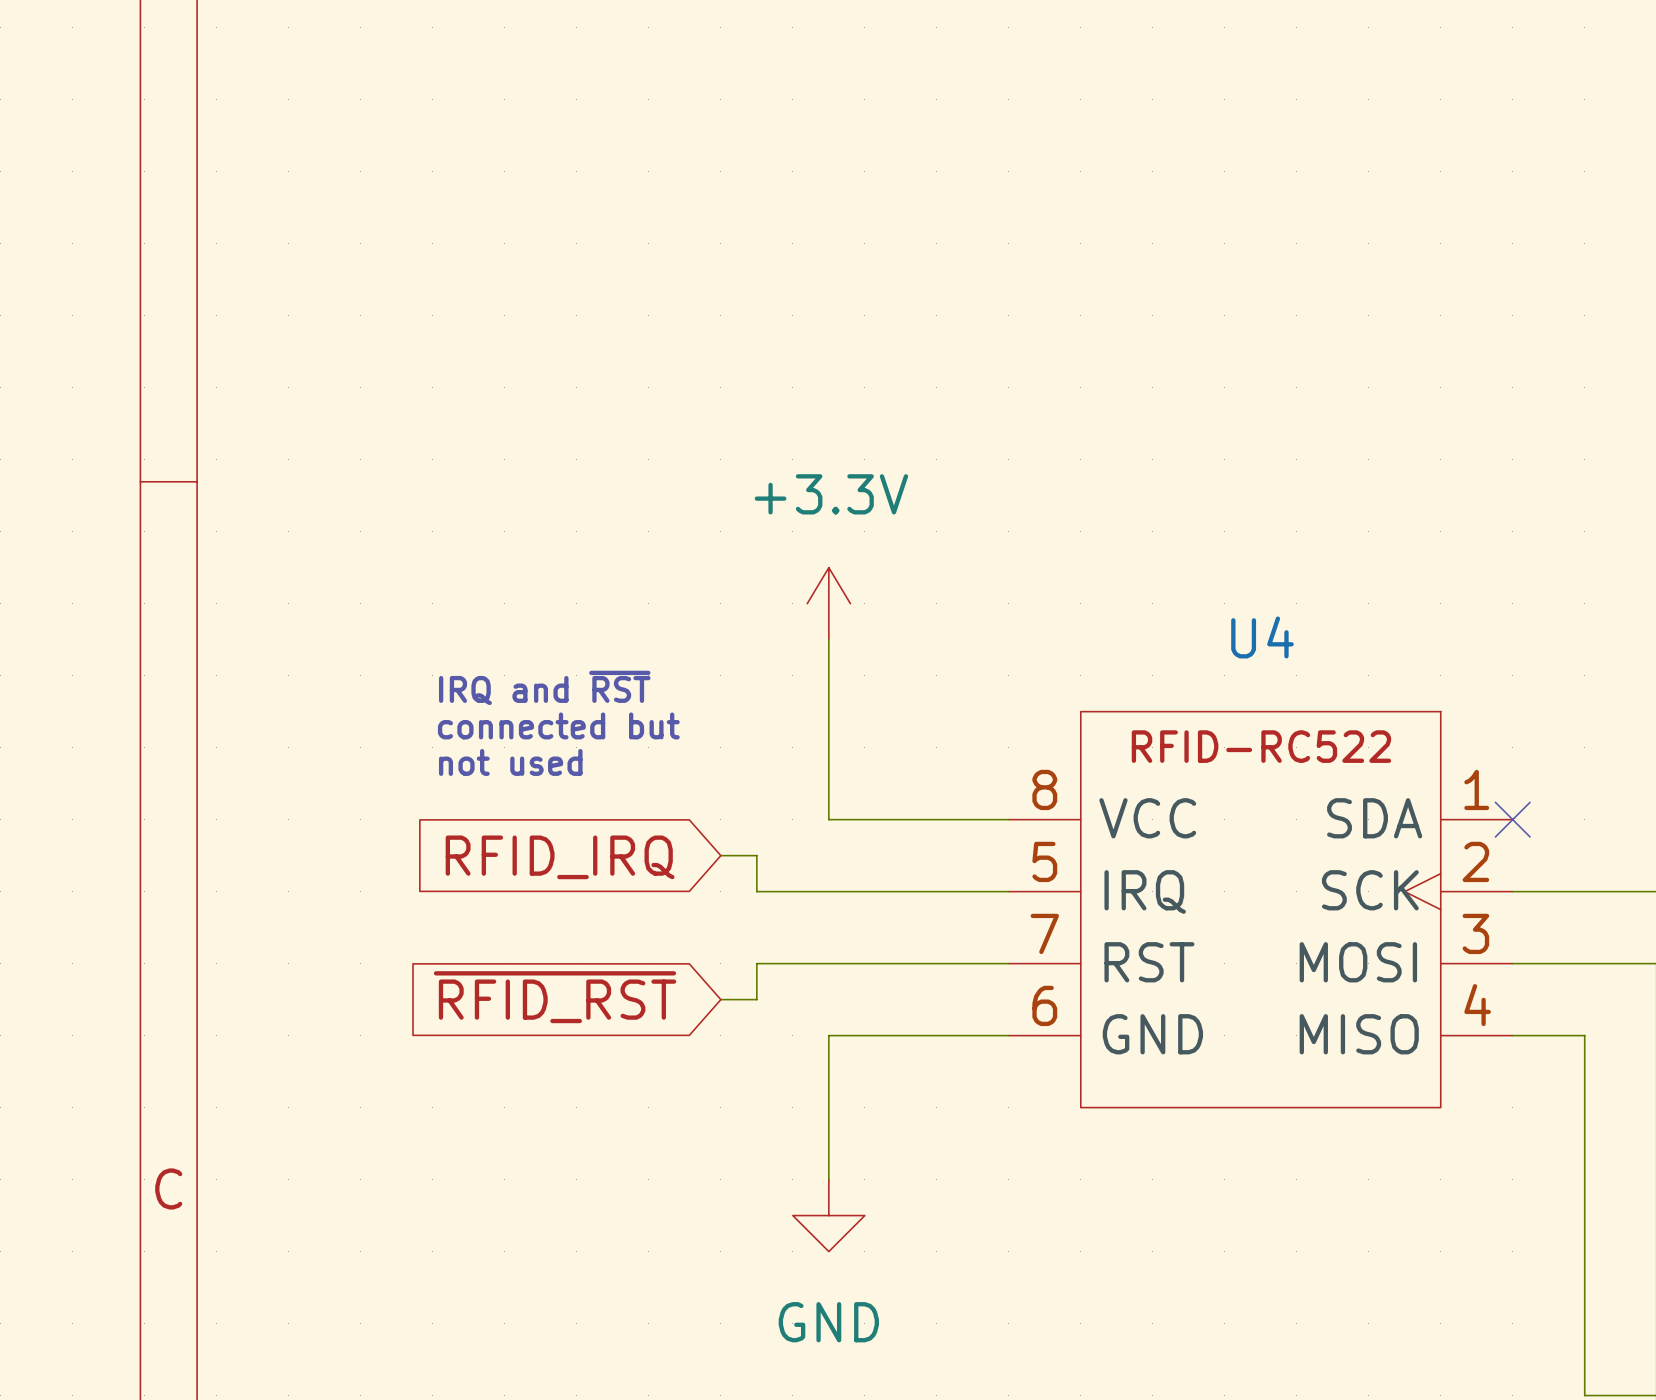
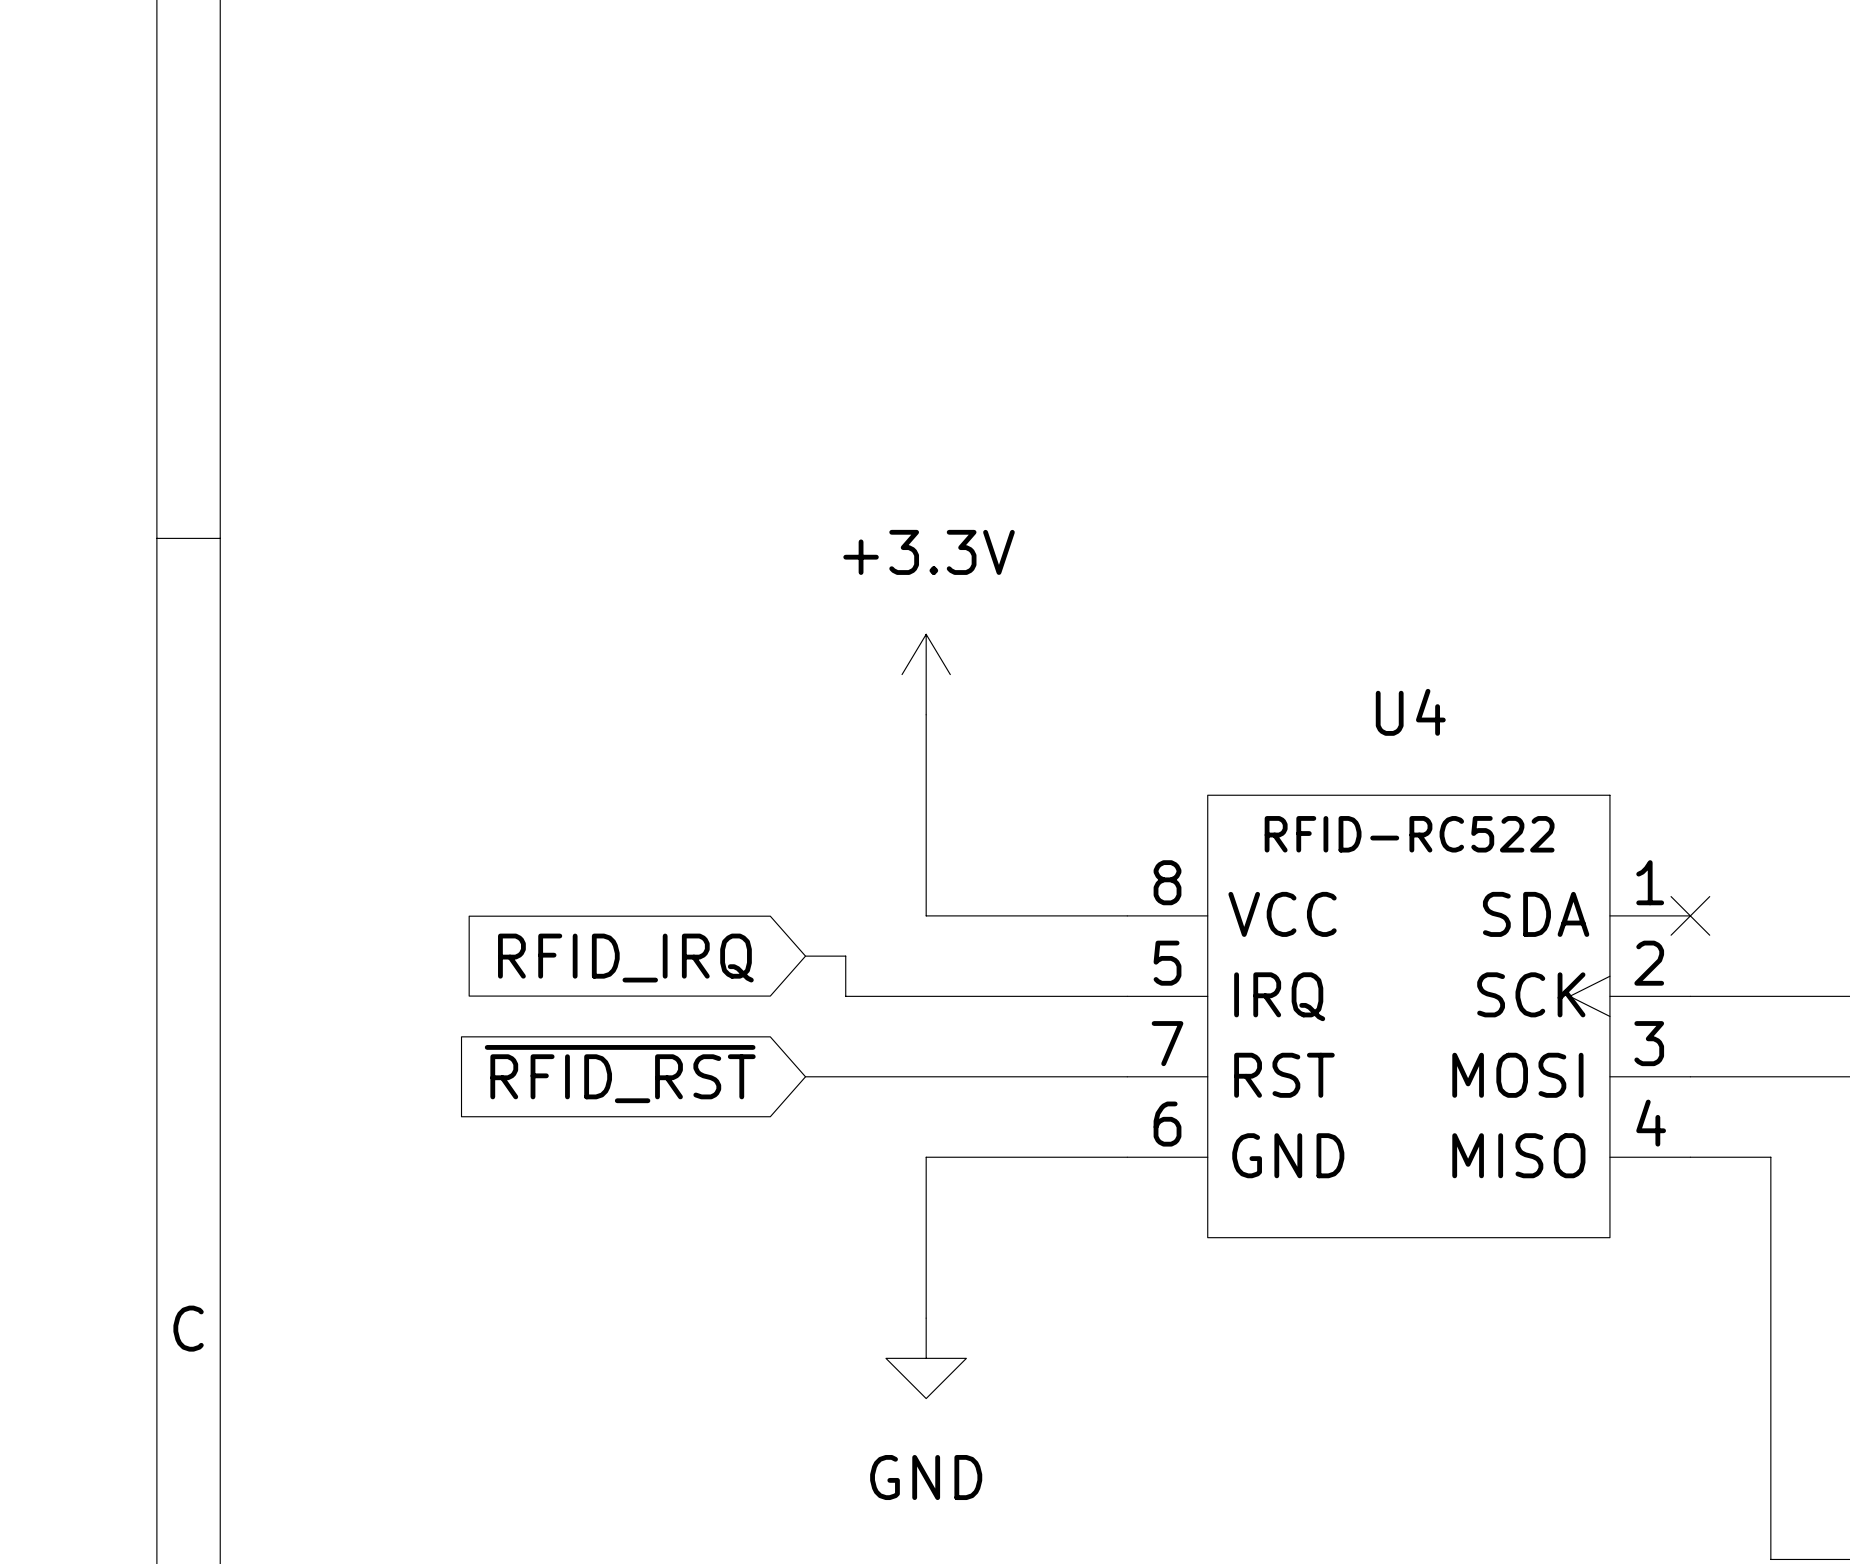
text: IRQ and ~{RST} (544, 687) -> none
text: connected but (558, 725) -> none
text: not used (510, 762) -> none
wire: (756, 963) (756, 999) (720, 999) -> (845, 1076) (805, 1076)
global label position: ~{RFID_RST} (555, 997) -> ~{RFID_RST} (620, 1074)

